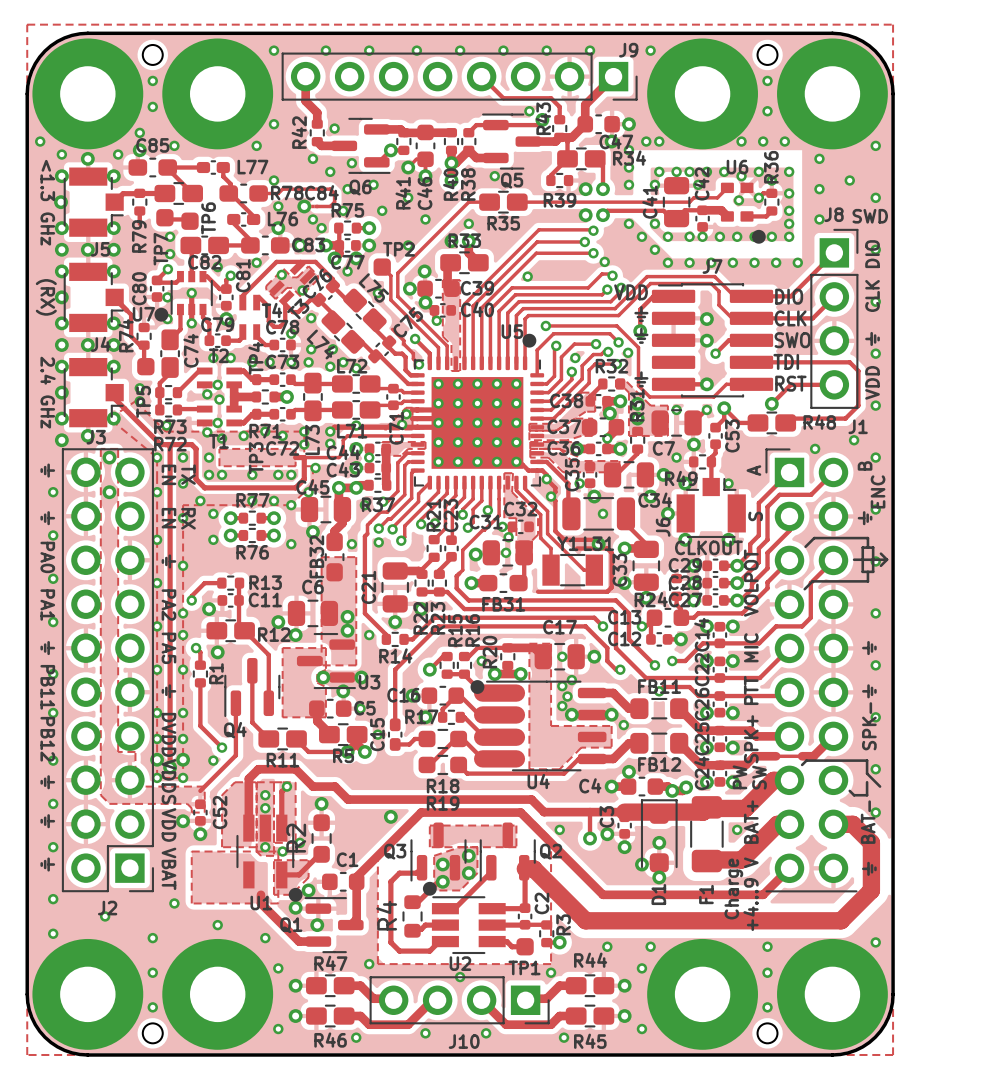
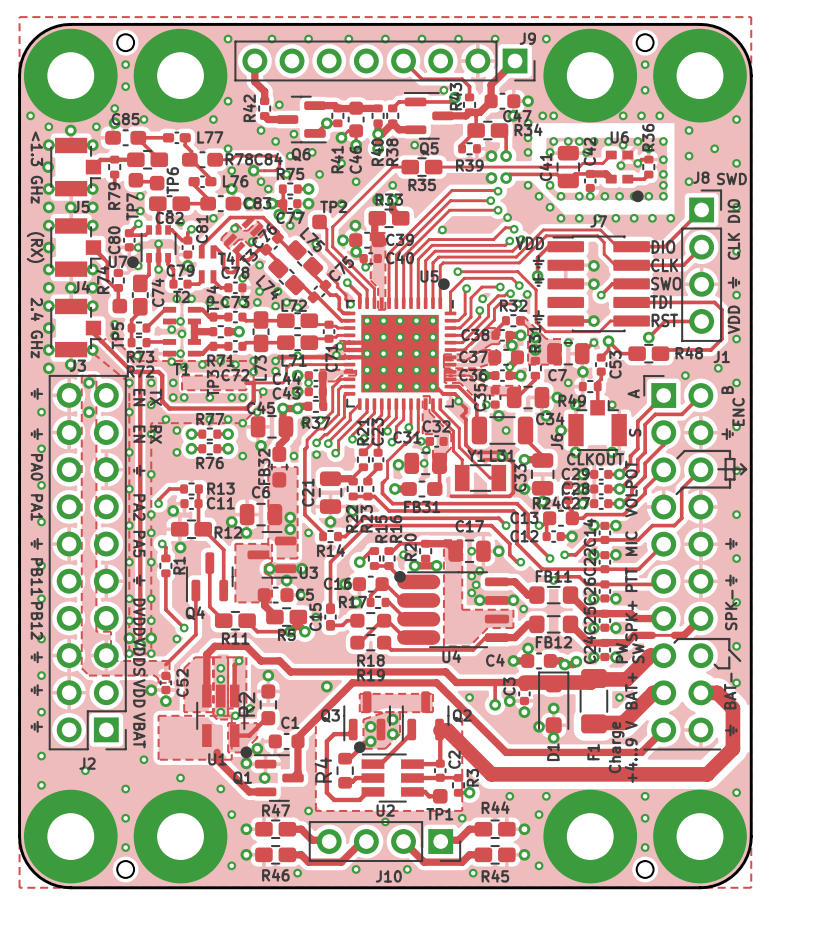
via: (551, 496) -> none

